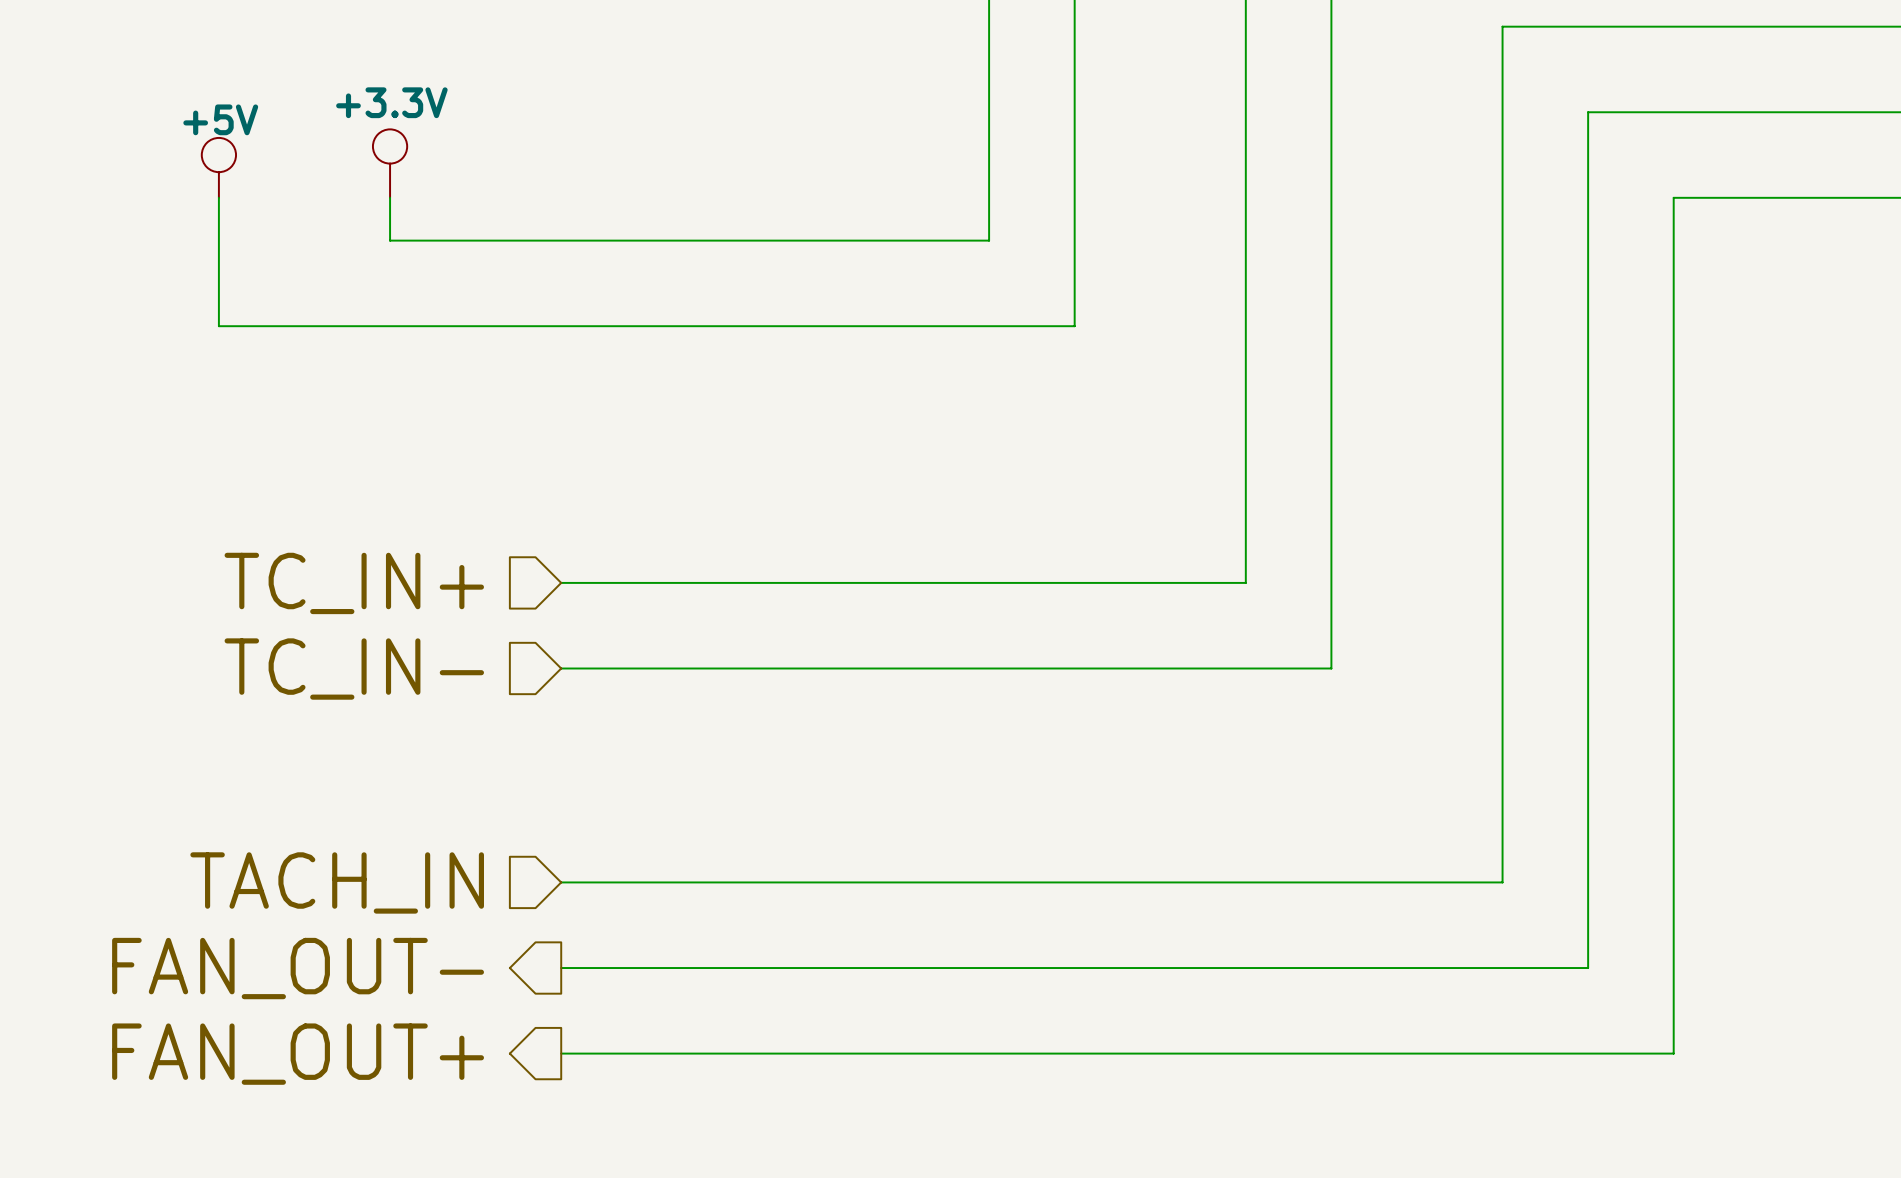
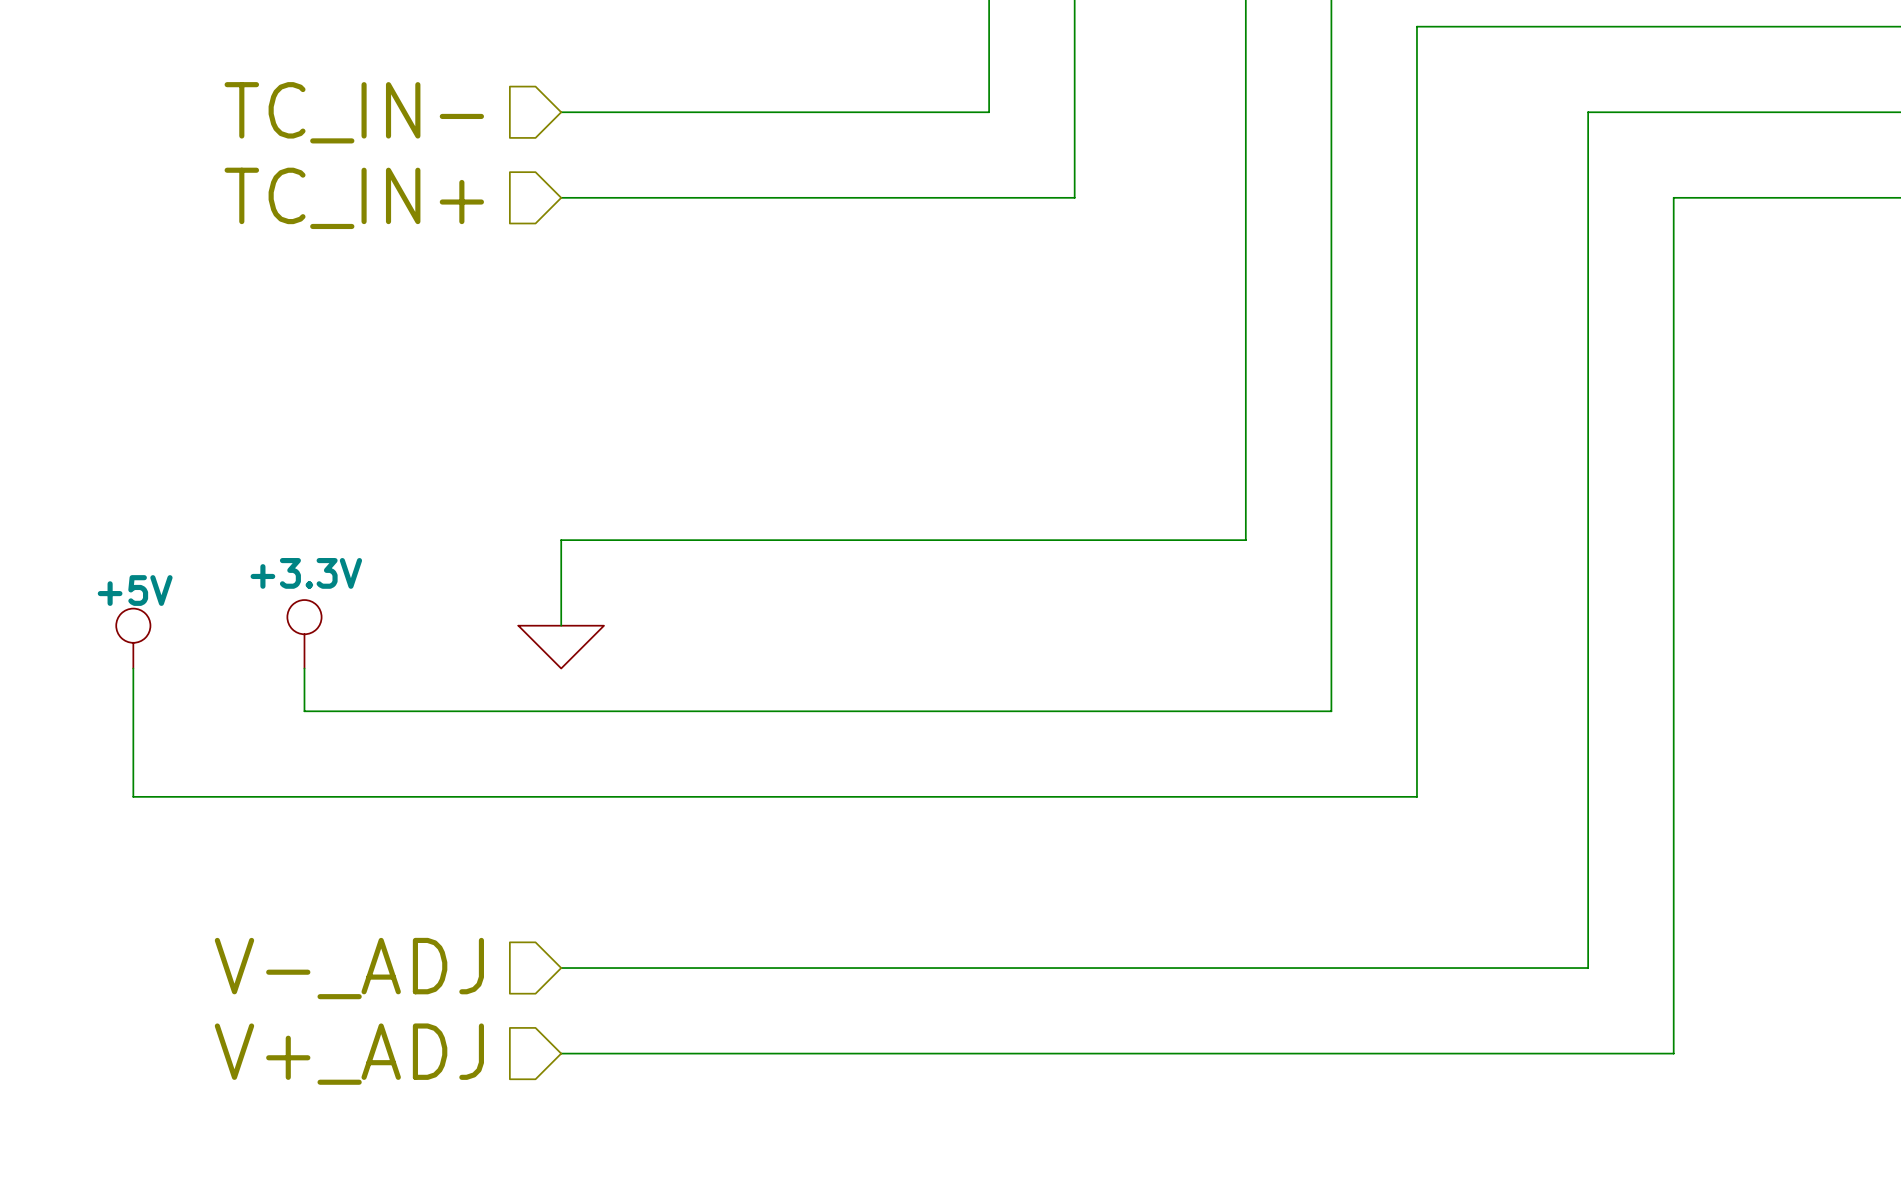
wire: (1502, 26) (1502, 882) (561, 882) -> (1502, 26) (1416, 26) (1416, 796) (133, 796) (133, 668)
wire: (989, 112) (989, 240) (390, 240) (390, 197) -> (989, 112) (561, 112)
power symbol position: +3.3V (390, 163) -> +3.3V (304, 634)
power symbol position: +5V (218, 167) -> +5V (133, 638)
wire: (218, 197) (218, 326) (1074, 326) (1074, 197) -> (561, 197) (1074, 197)
wire: (1245, 540) (1245, 582) (561, 582) -> (1245, 540) (561, 540) (561, 625)
hierarchical label position: TC_IN+ (354, 583) -> TC_IN+ (354, 198)
power symbol: none -> (561, 647)
wire: (561, 668) (1331, 668) -> (304, 668) (304, 711) (1331, 711) (1331, 668)
hierarchical label position: TC_IN- (354, 669) -> TC_IN- (354, 112)
hierarchical label: TACH_IN (337, 882) -> none
hierarchical label shape: output (298, 968) -> input (349, 968)
hierarchical label: FAN_OUT- (298, 968) -> V-_ADJ (349, 968)
hierarchical label shape: output (298, 1054) -> input (349, 1054)
hierarchical label: FAN_OUT+ (298, 1054) -> V+_ADJ (349, 1054)

